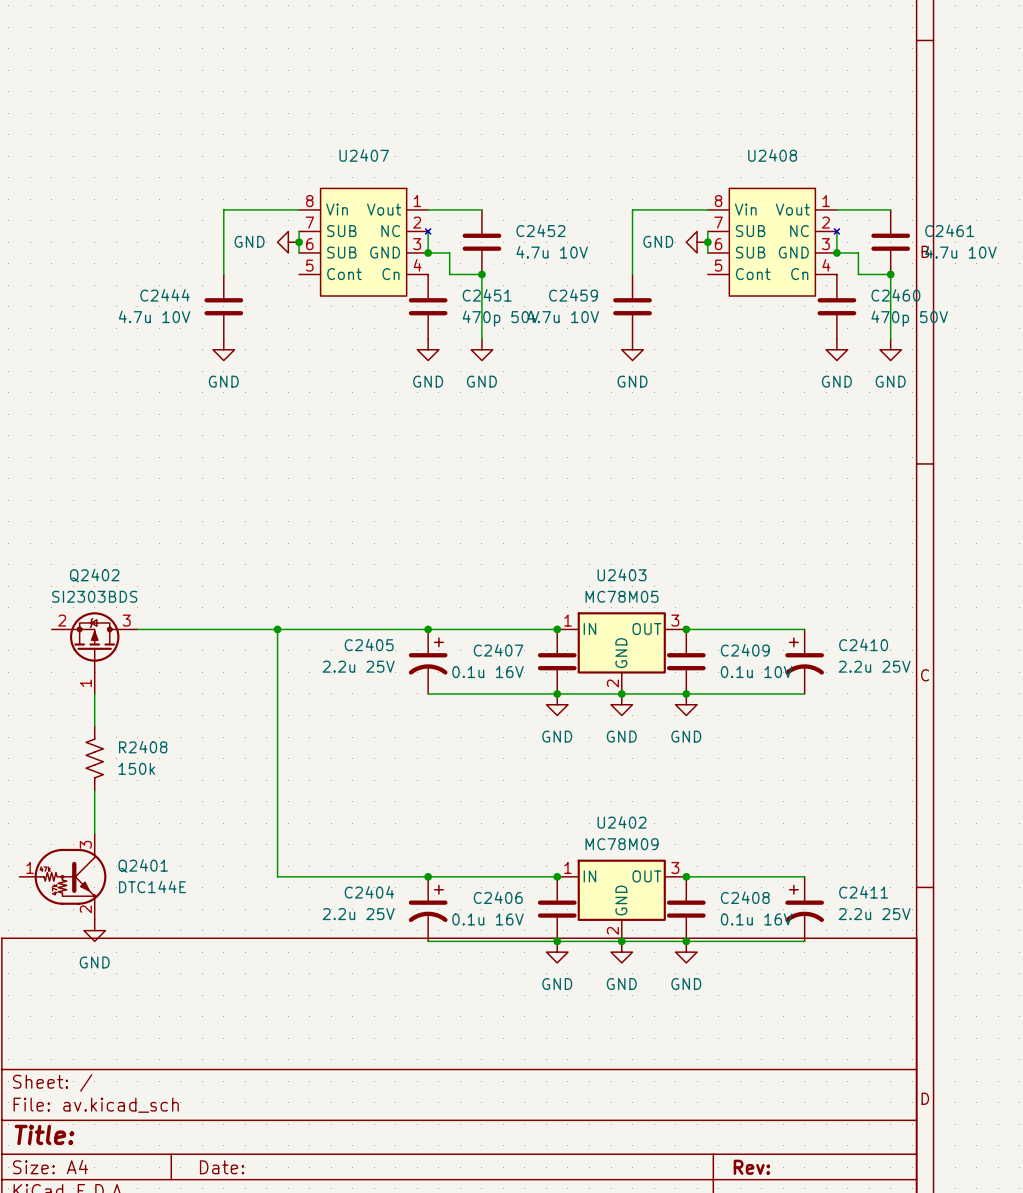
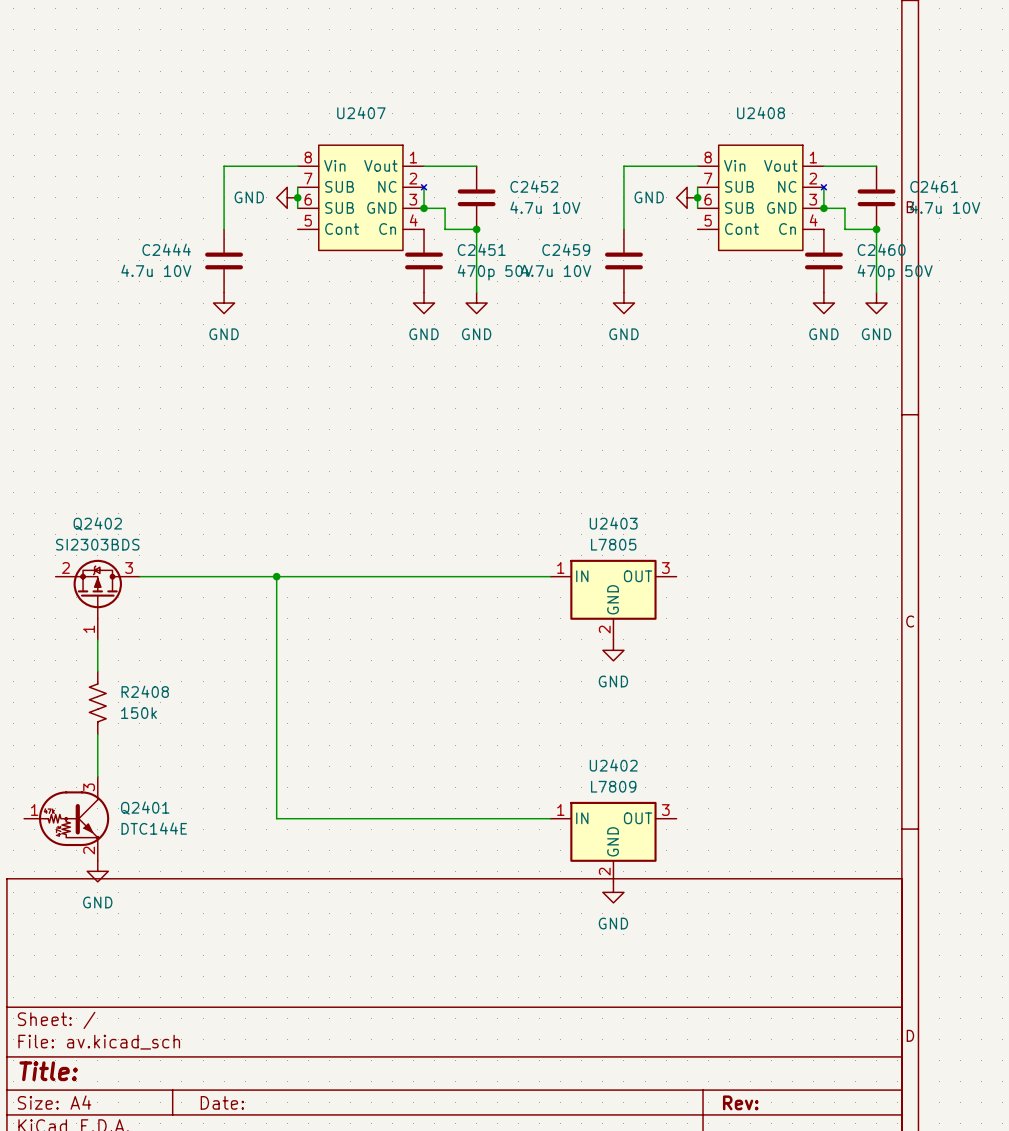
U2403 value: MC78M05 (622, 596) -> L7805 (613, 544)
junction: (428, 629) -> none
junction: (557, 629) -> none
wire: (686, 629) (804, 629) -> none
junction: (686, 629) -> none
C2405: 2.2u 25V (428, 661) -> none
C2407: 0.1u 16V (557, 661) -> none
C2409: 0.1u 10V (686, 661) -> none
C2410: 2.2u 25V (804, 661) -> none
wire: (428, 693) (804, 693) -> none
junction: (557, 693) -> none
junction: (621, 693) -> none
junction: (686, 693) -> none
power symbol: GND (557, 704) -> none
power symbol: GND (686, 704) -> none
U2402 value: MC78M09 (622, 844) -> L7809 (613, 786)
junction: (428, 876) -> none
junction: (557, 876) -> none
wire: (686, 876) (804, 876) -> none
junction: (686, 876) -> none
C2404: 2.2u 25V (428, 909) -> none
C2406: 0.1u 16V (557, 909) -> none
C2408: 0.1u 16V (686, 909) -> none
C2411: 2.2u 25V (804, 909) -> none
wire: (428, 941) (804, 941) -> none
junction: (557, 941) -> none
junction: (621, 941) -> none
junction: (686, 941) -> none
power symbol: GND (557, 952) -> none
power symbol: GND (686, 952) -> none

